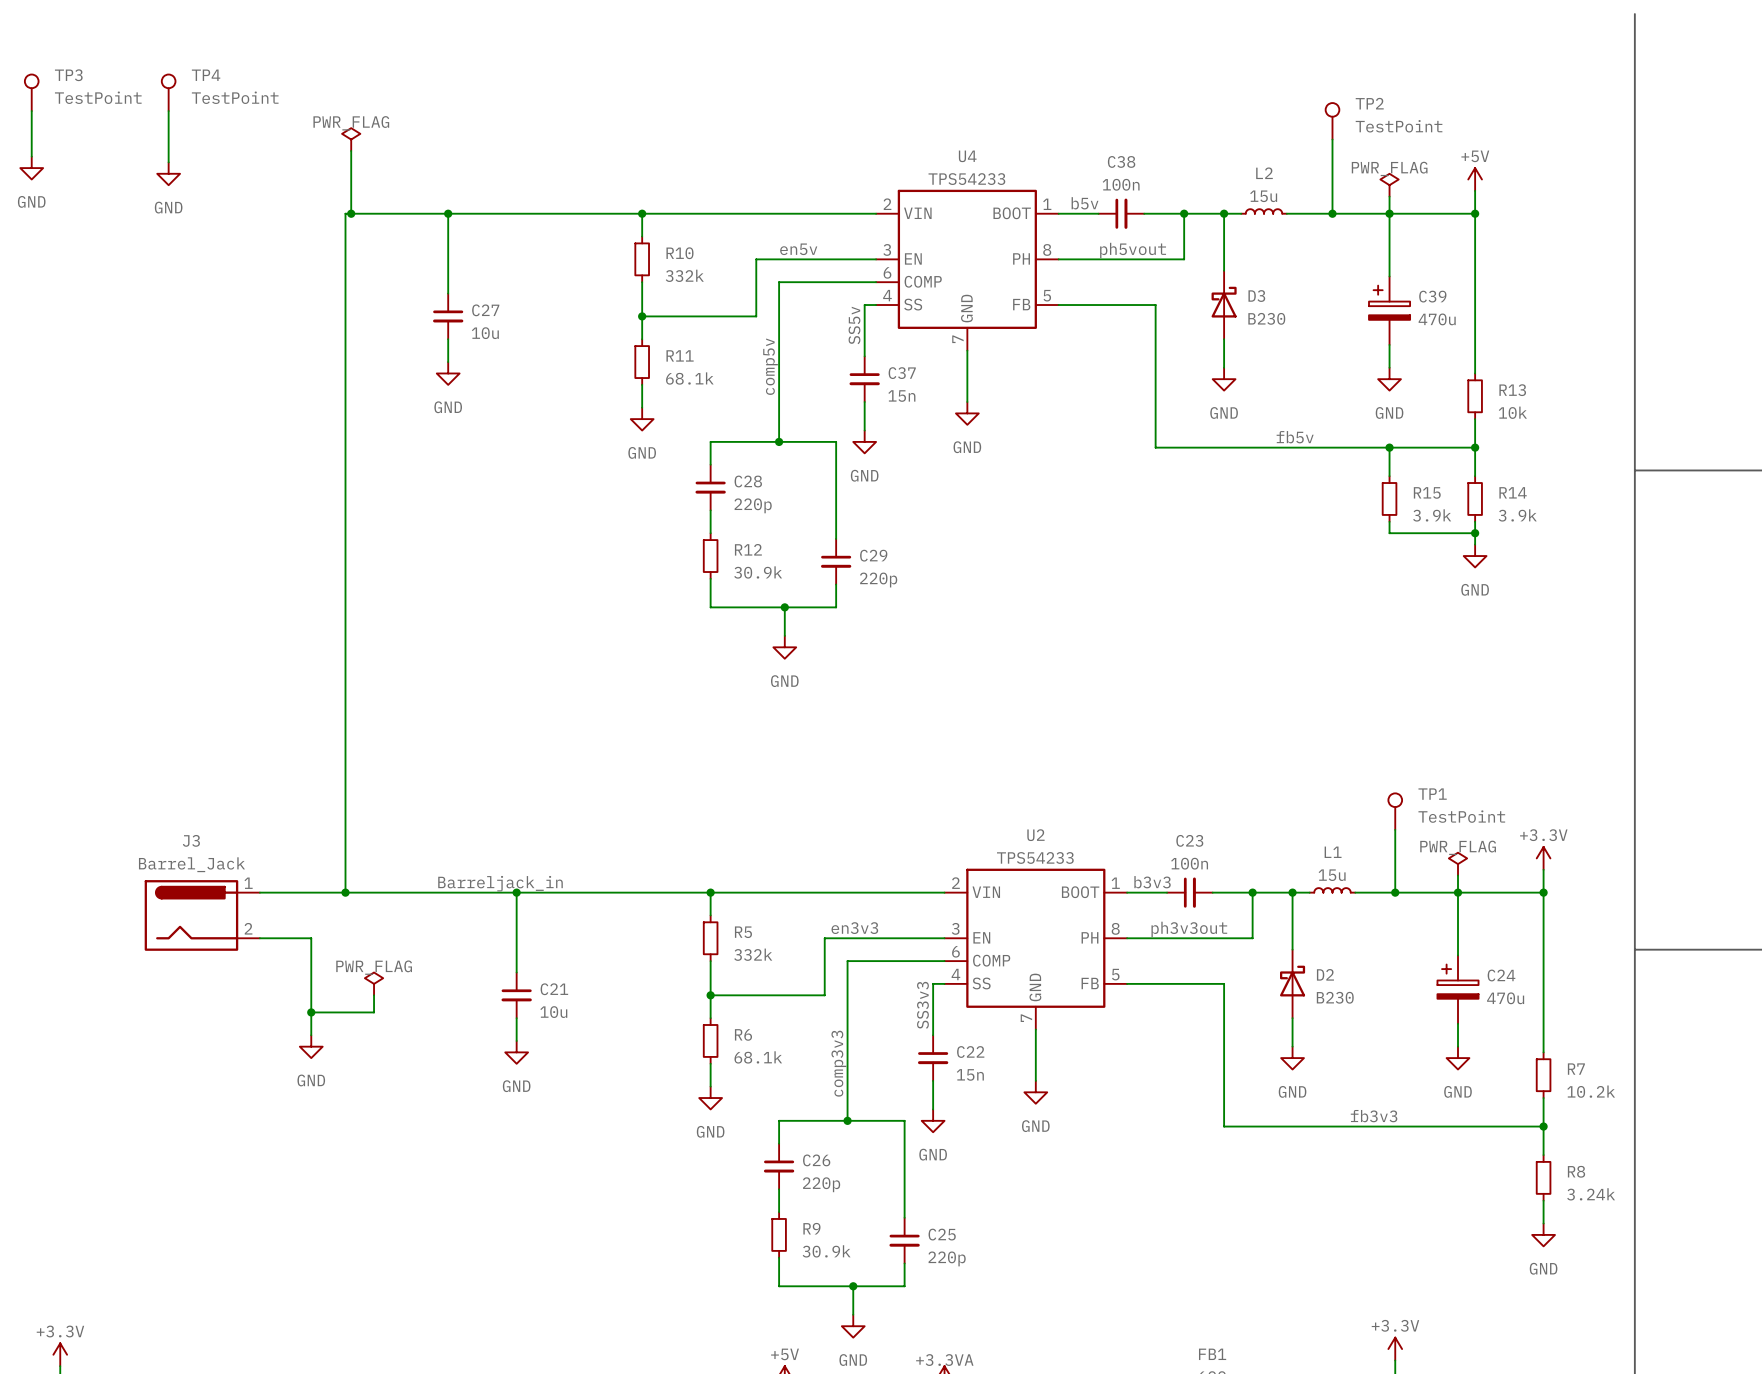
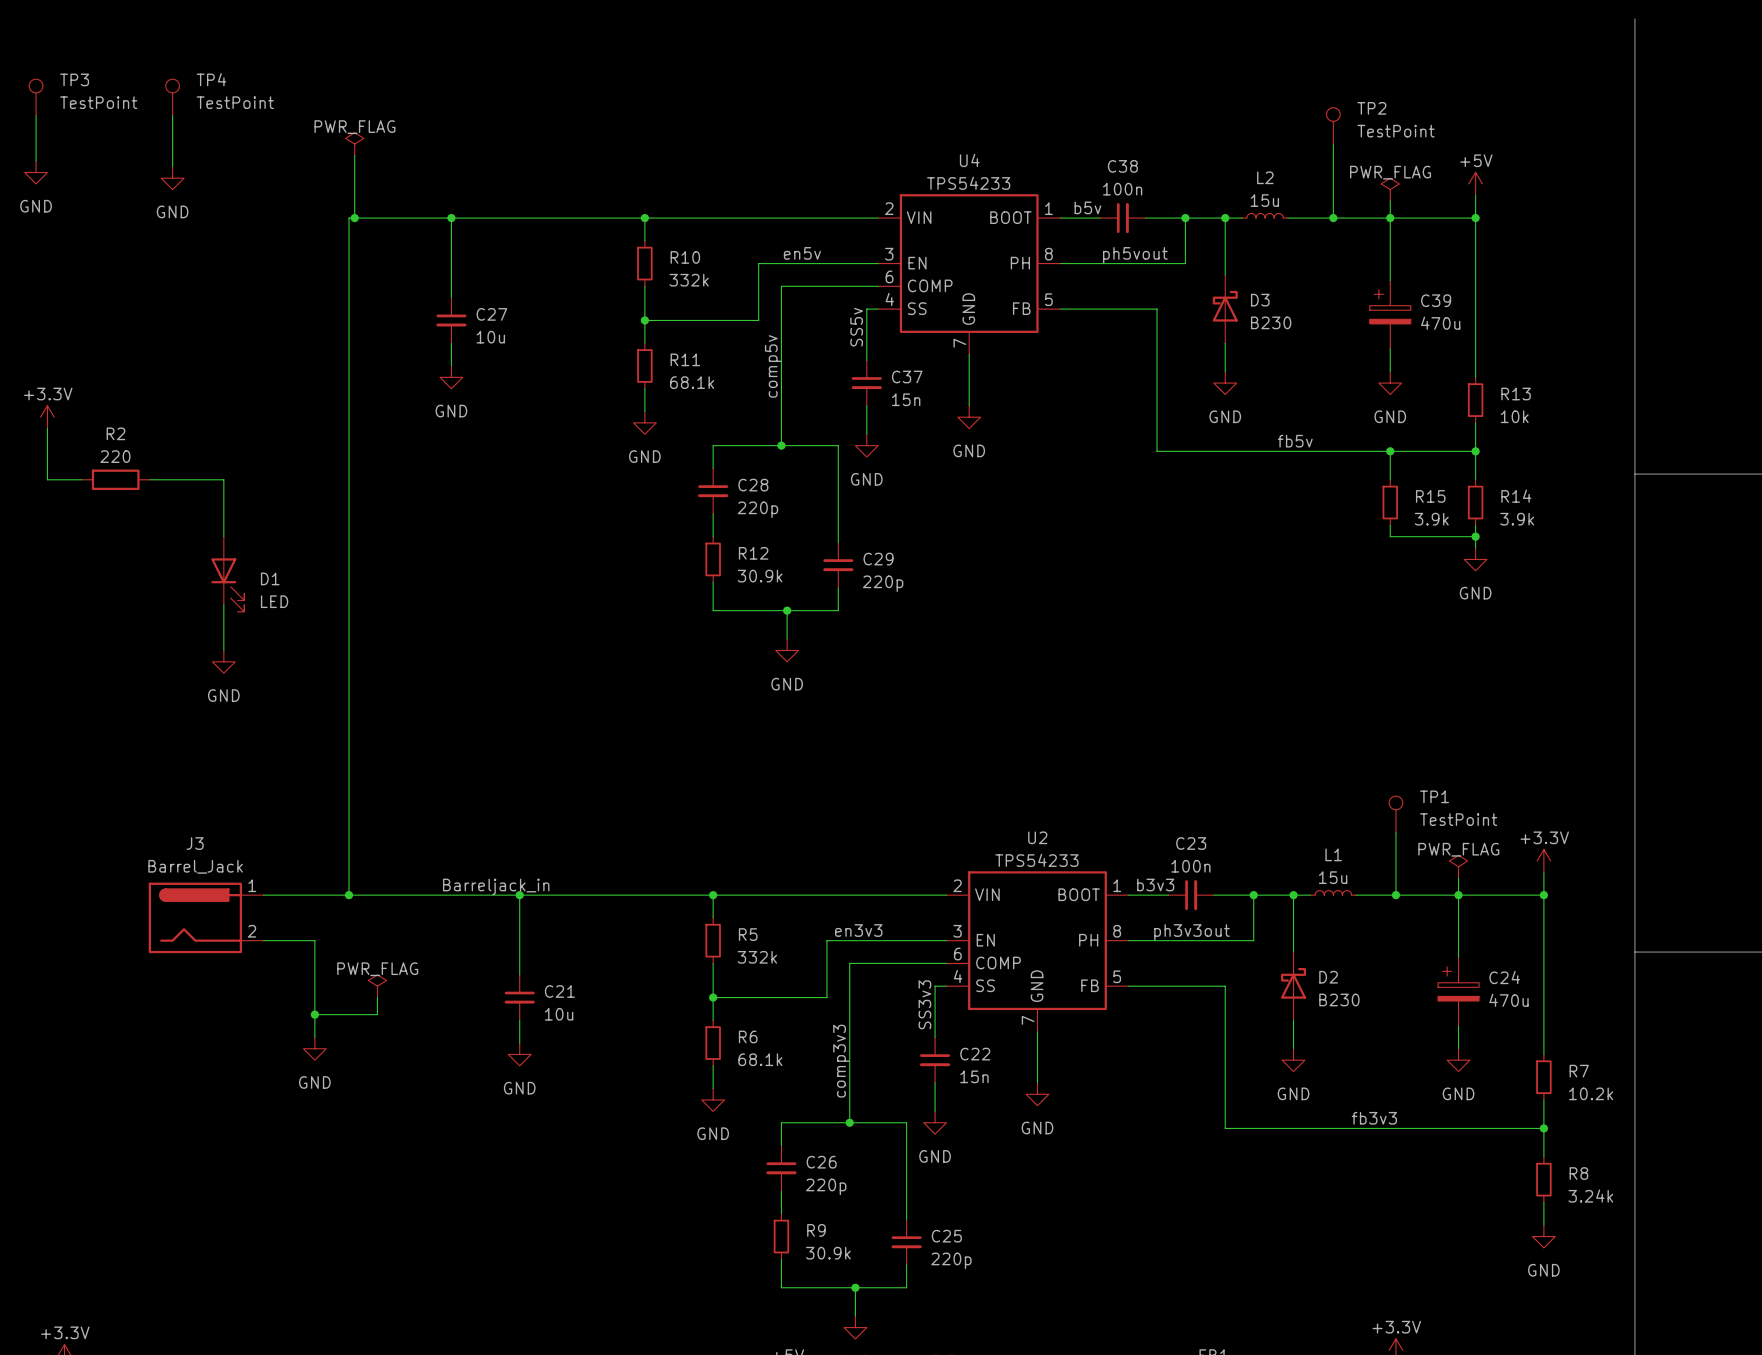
power symbol: none -> +3.3V (47, 417)
wire: none -> (47, 428) (47, 479) (81, 479)
R2: none -> 220 (115, 479)
wire: none -> (149, 479) (223, 479) (223, 536)
D1: none -> LED (227, 574)
wire: none -> (223, 604) (223, 650)
power symbol: none -> GND (223, 661)

